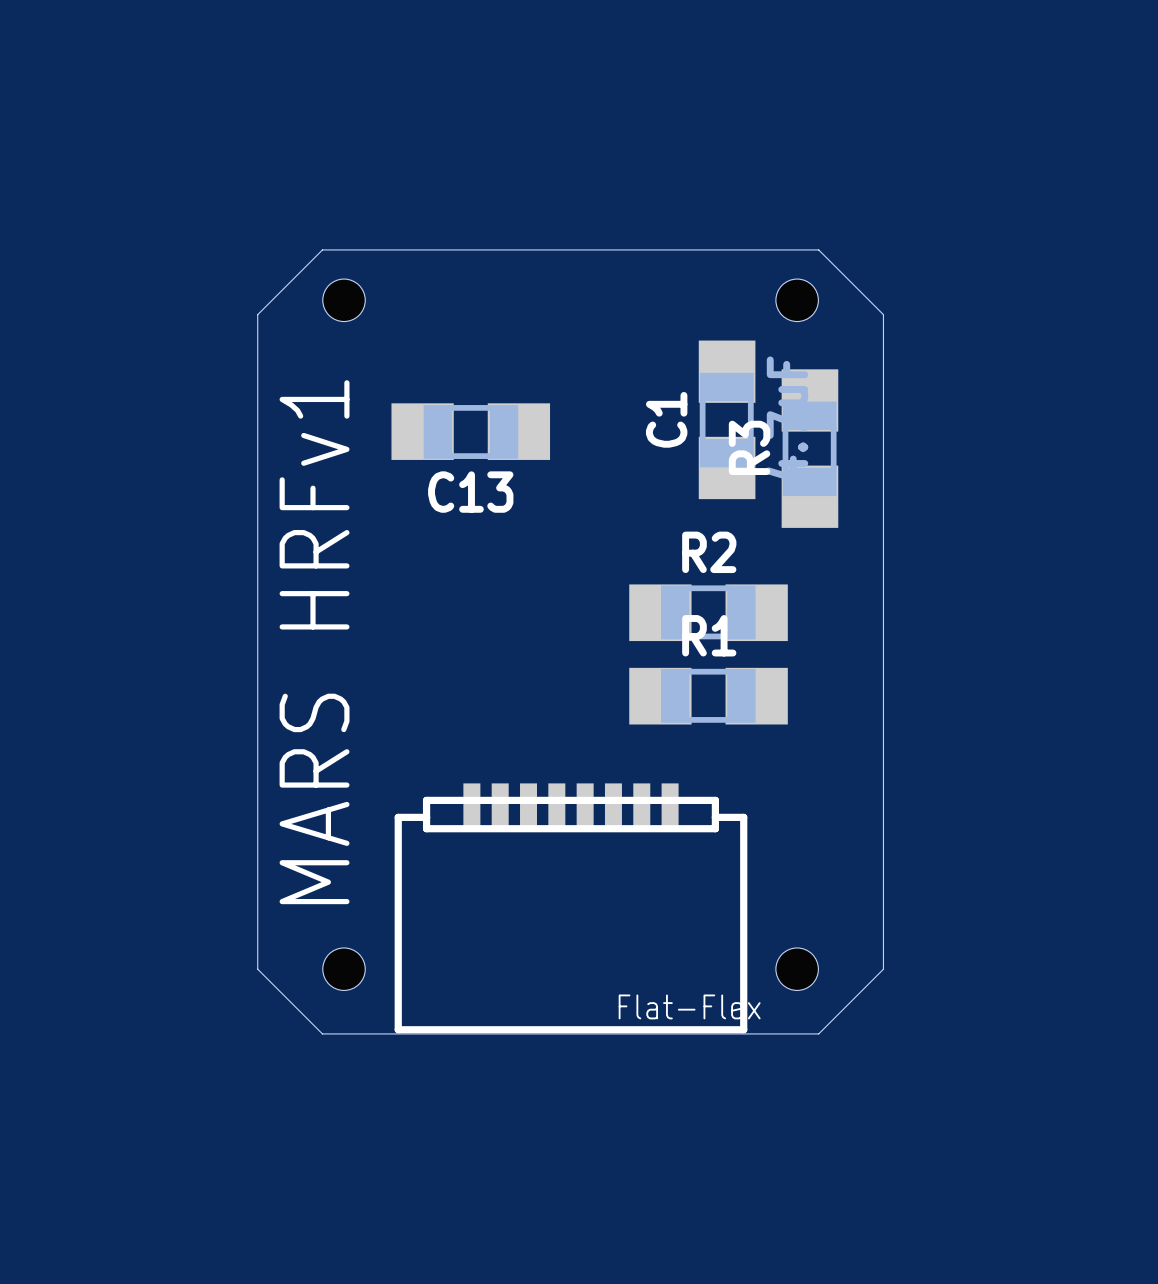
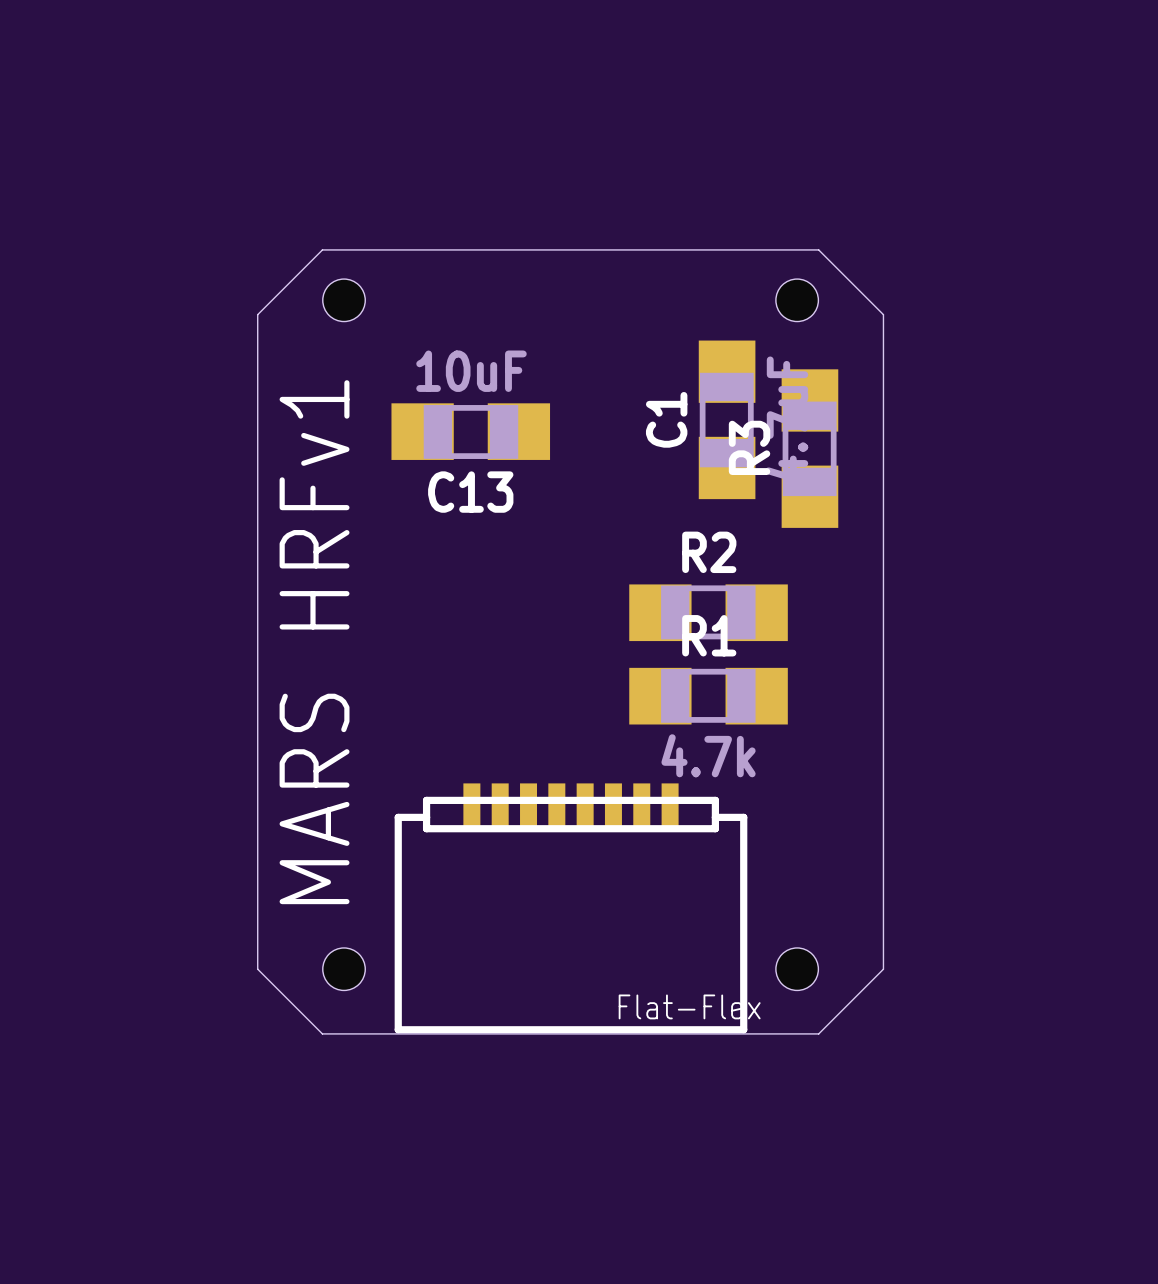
C13 value: none -> 10uF (471, 371)
R1 value: none -> 4.7k (708, 755)

